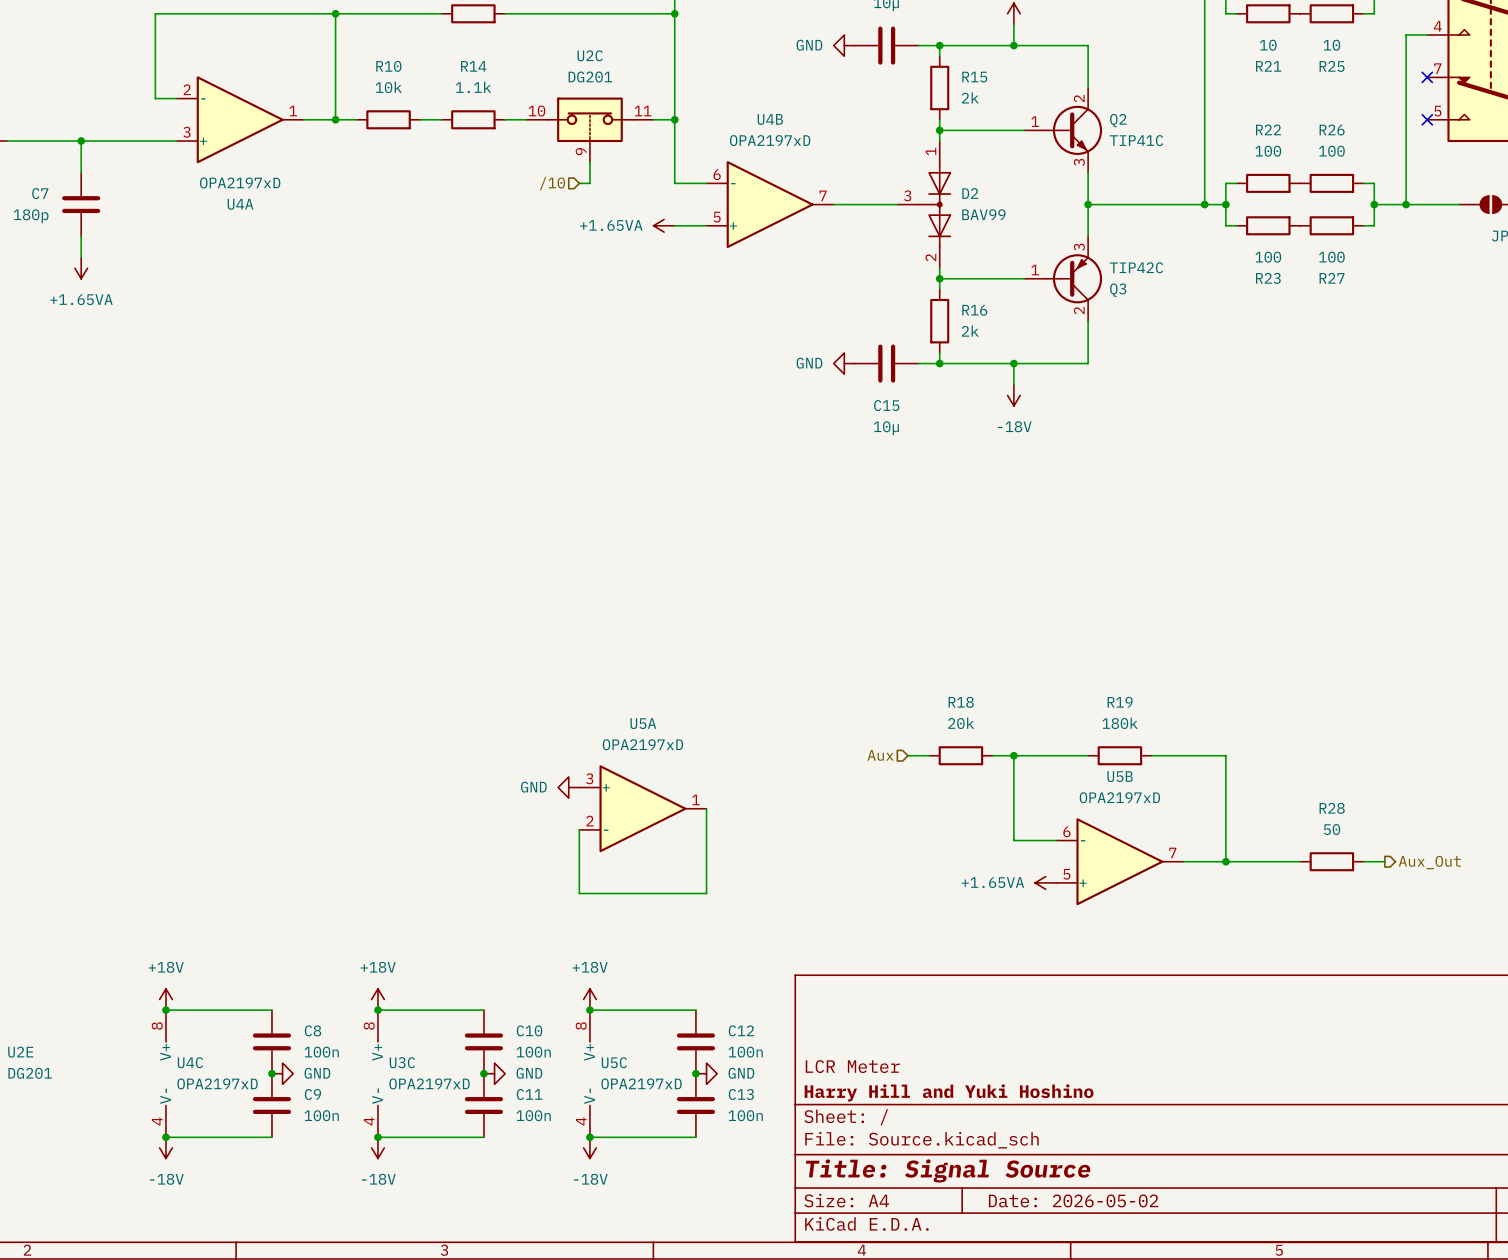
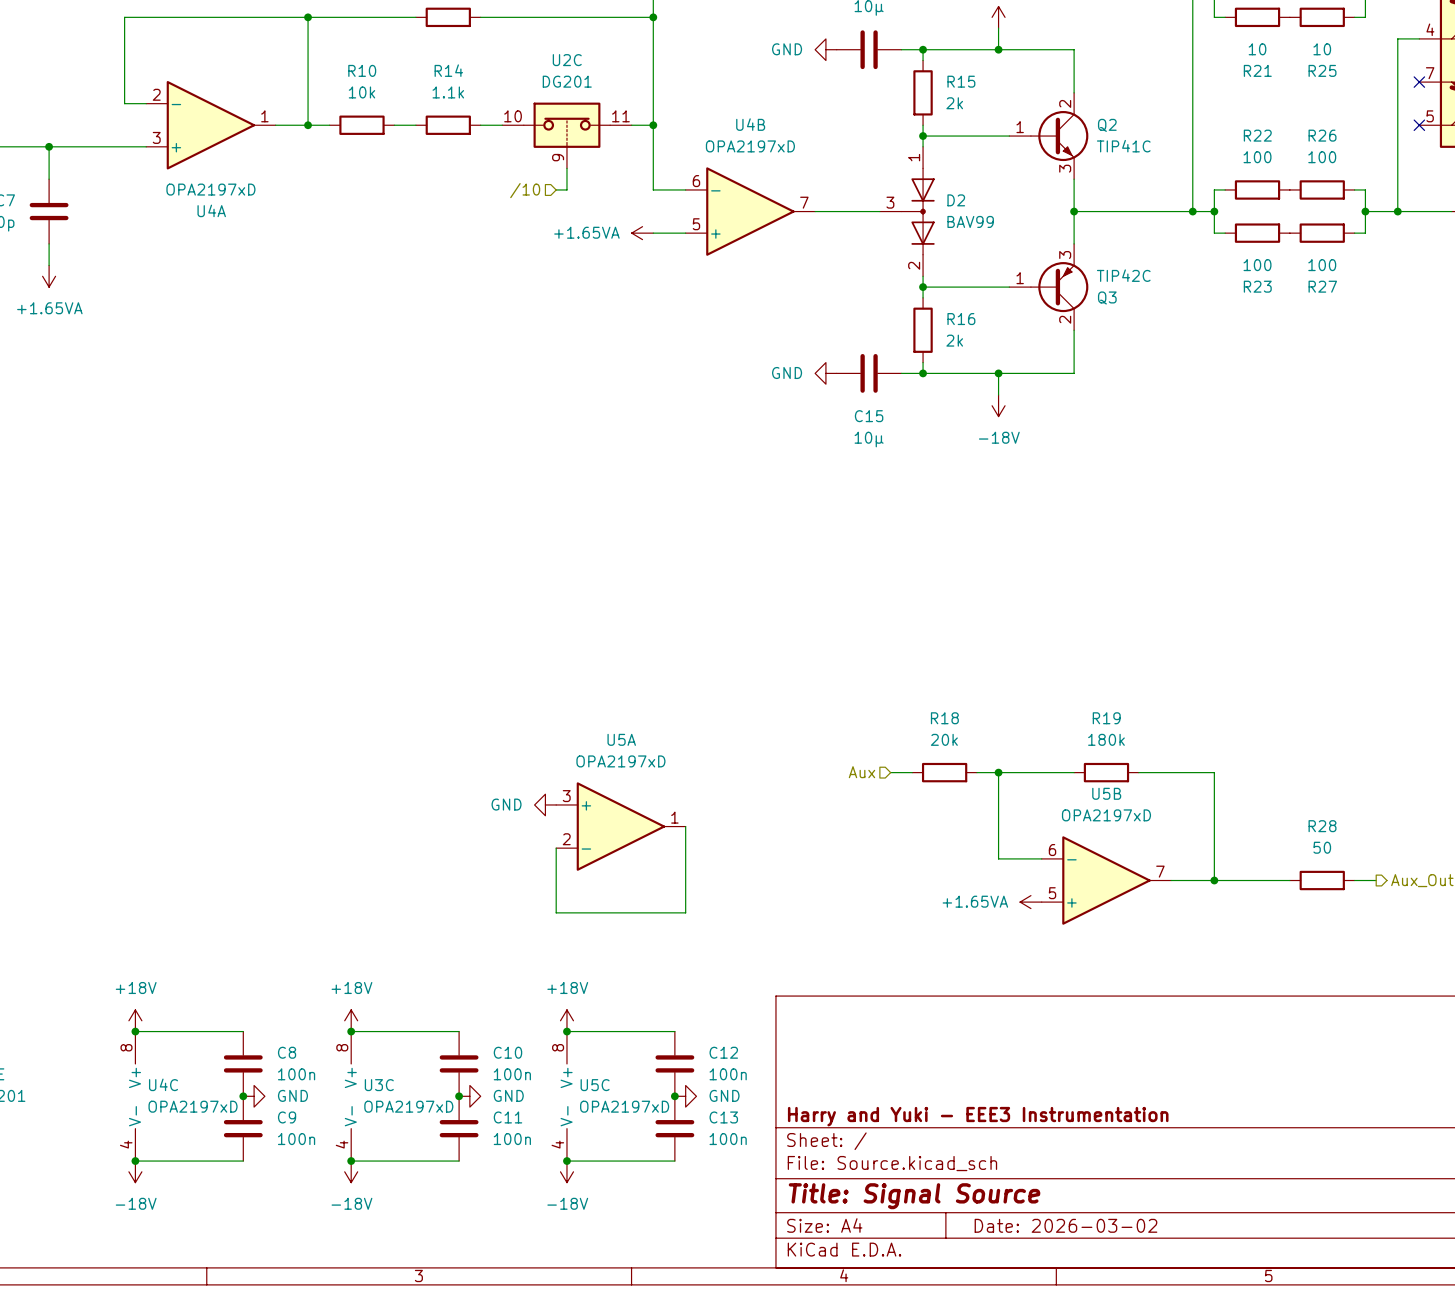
title block: LCR Meter (852, 1066) -> none
title block: Harry Hill and Yuki Hoshino (949, 1092) -> Harry and Yuki - EEE3 Instrumentation (978, 1116)
title block: Date: 2026-05-02 (1073, 1200) -> Date: 2026-03-02 (1065, 1225)

